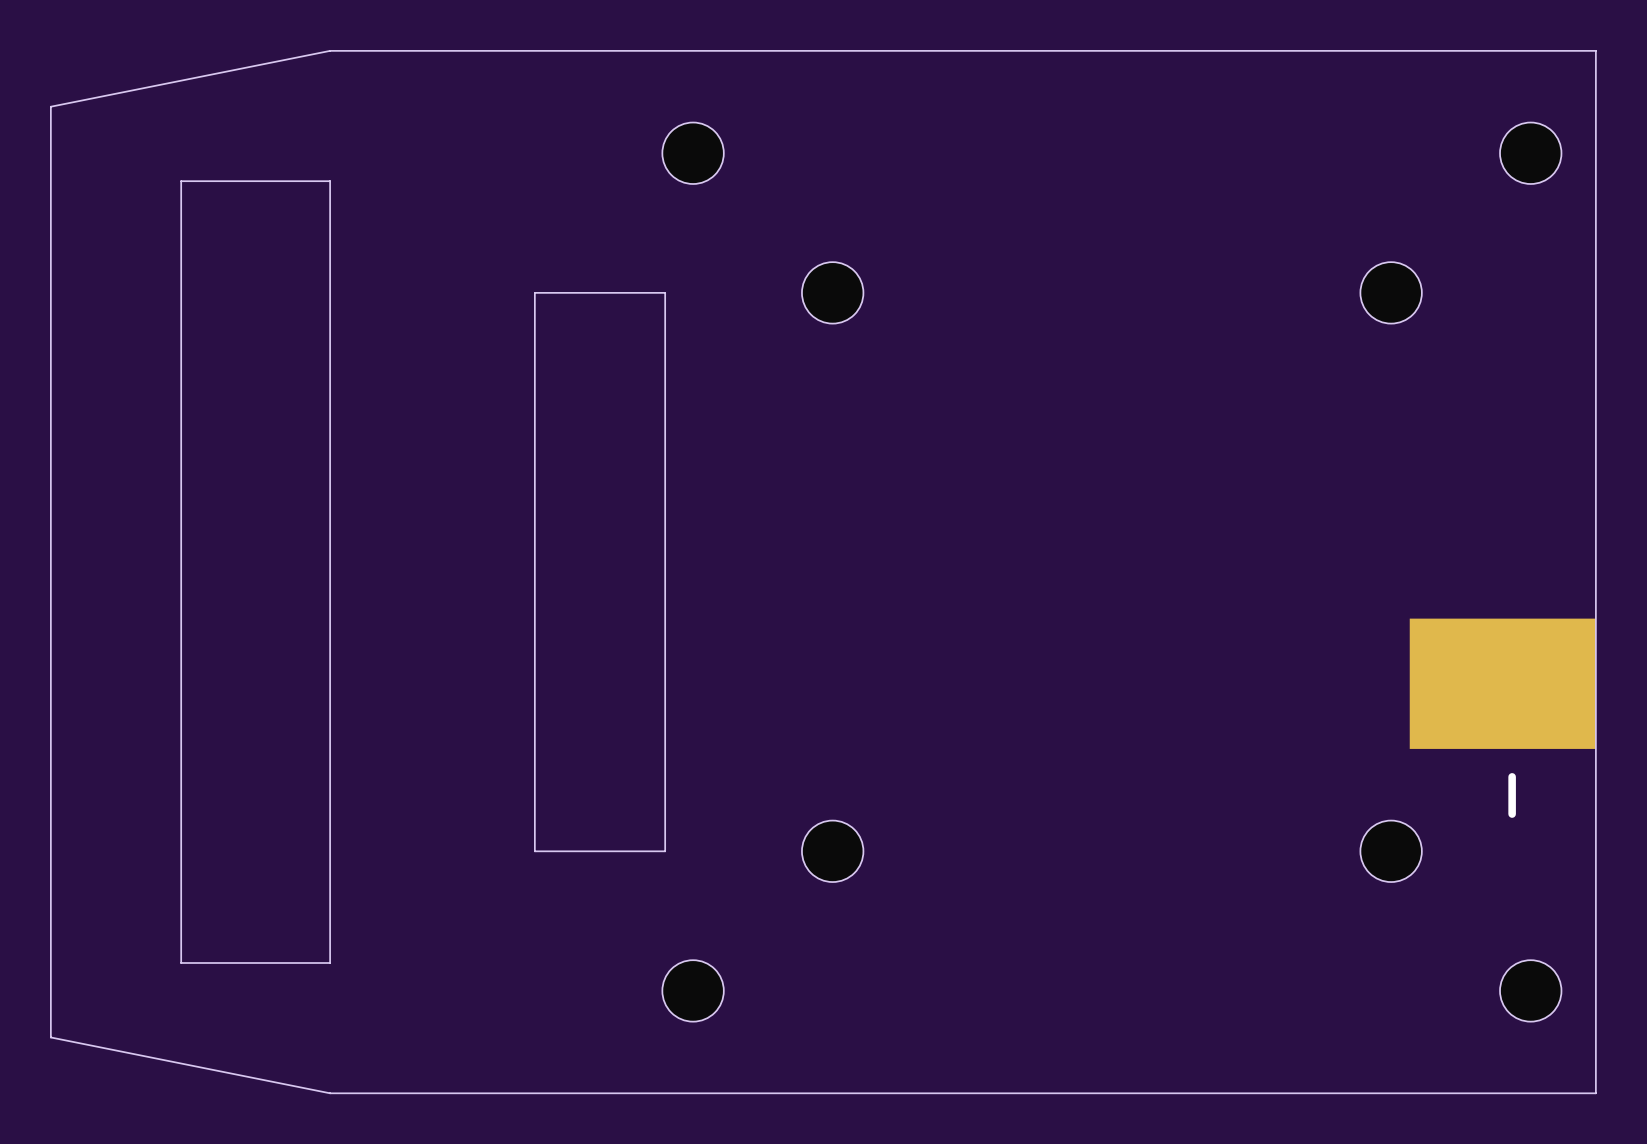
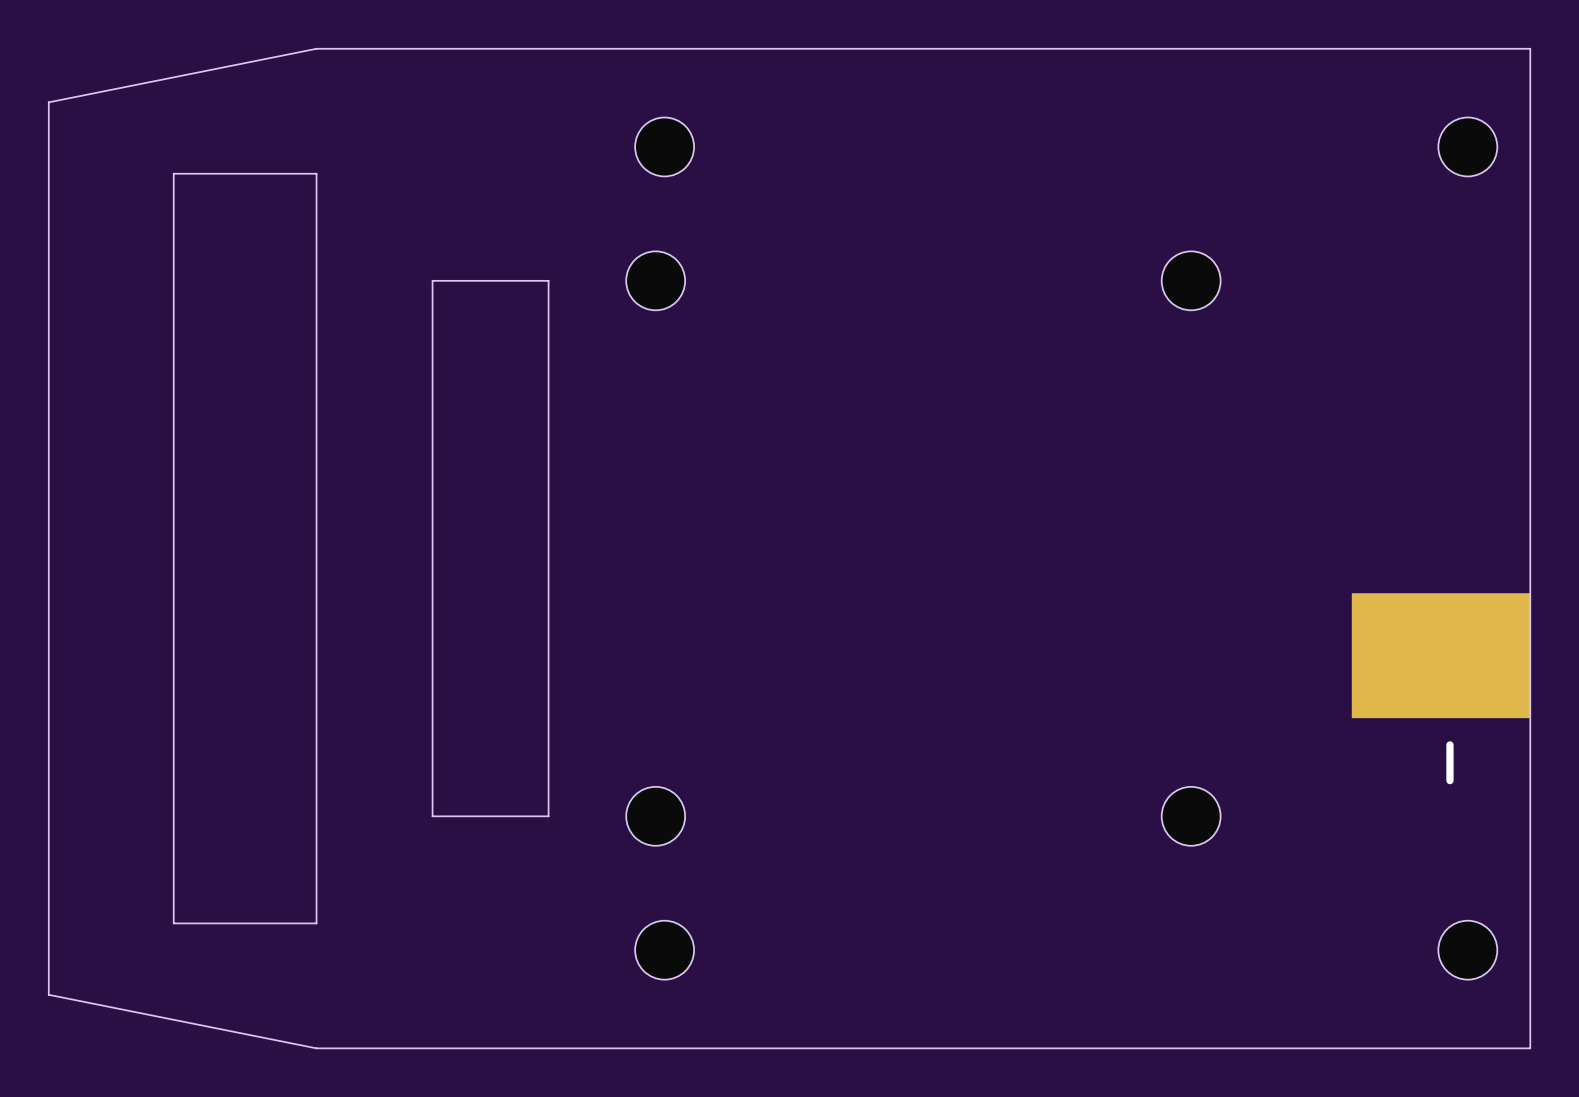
board edge: (534, 292) (534, 851) -> (512, 280) (432, 280) (432, 816) (512, 816)
board edge: (572, 292) (665, 292) (665, 851) (572, 851) -> (548, 280) (548, 816)
part position: (832, 292) -> (655, 280)
part position: (1391, 292) -> (1191, 280)
part position: (832, 851) -> (655, 816)
part position: (1391, 851) -> (1191, 816)

